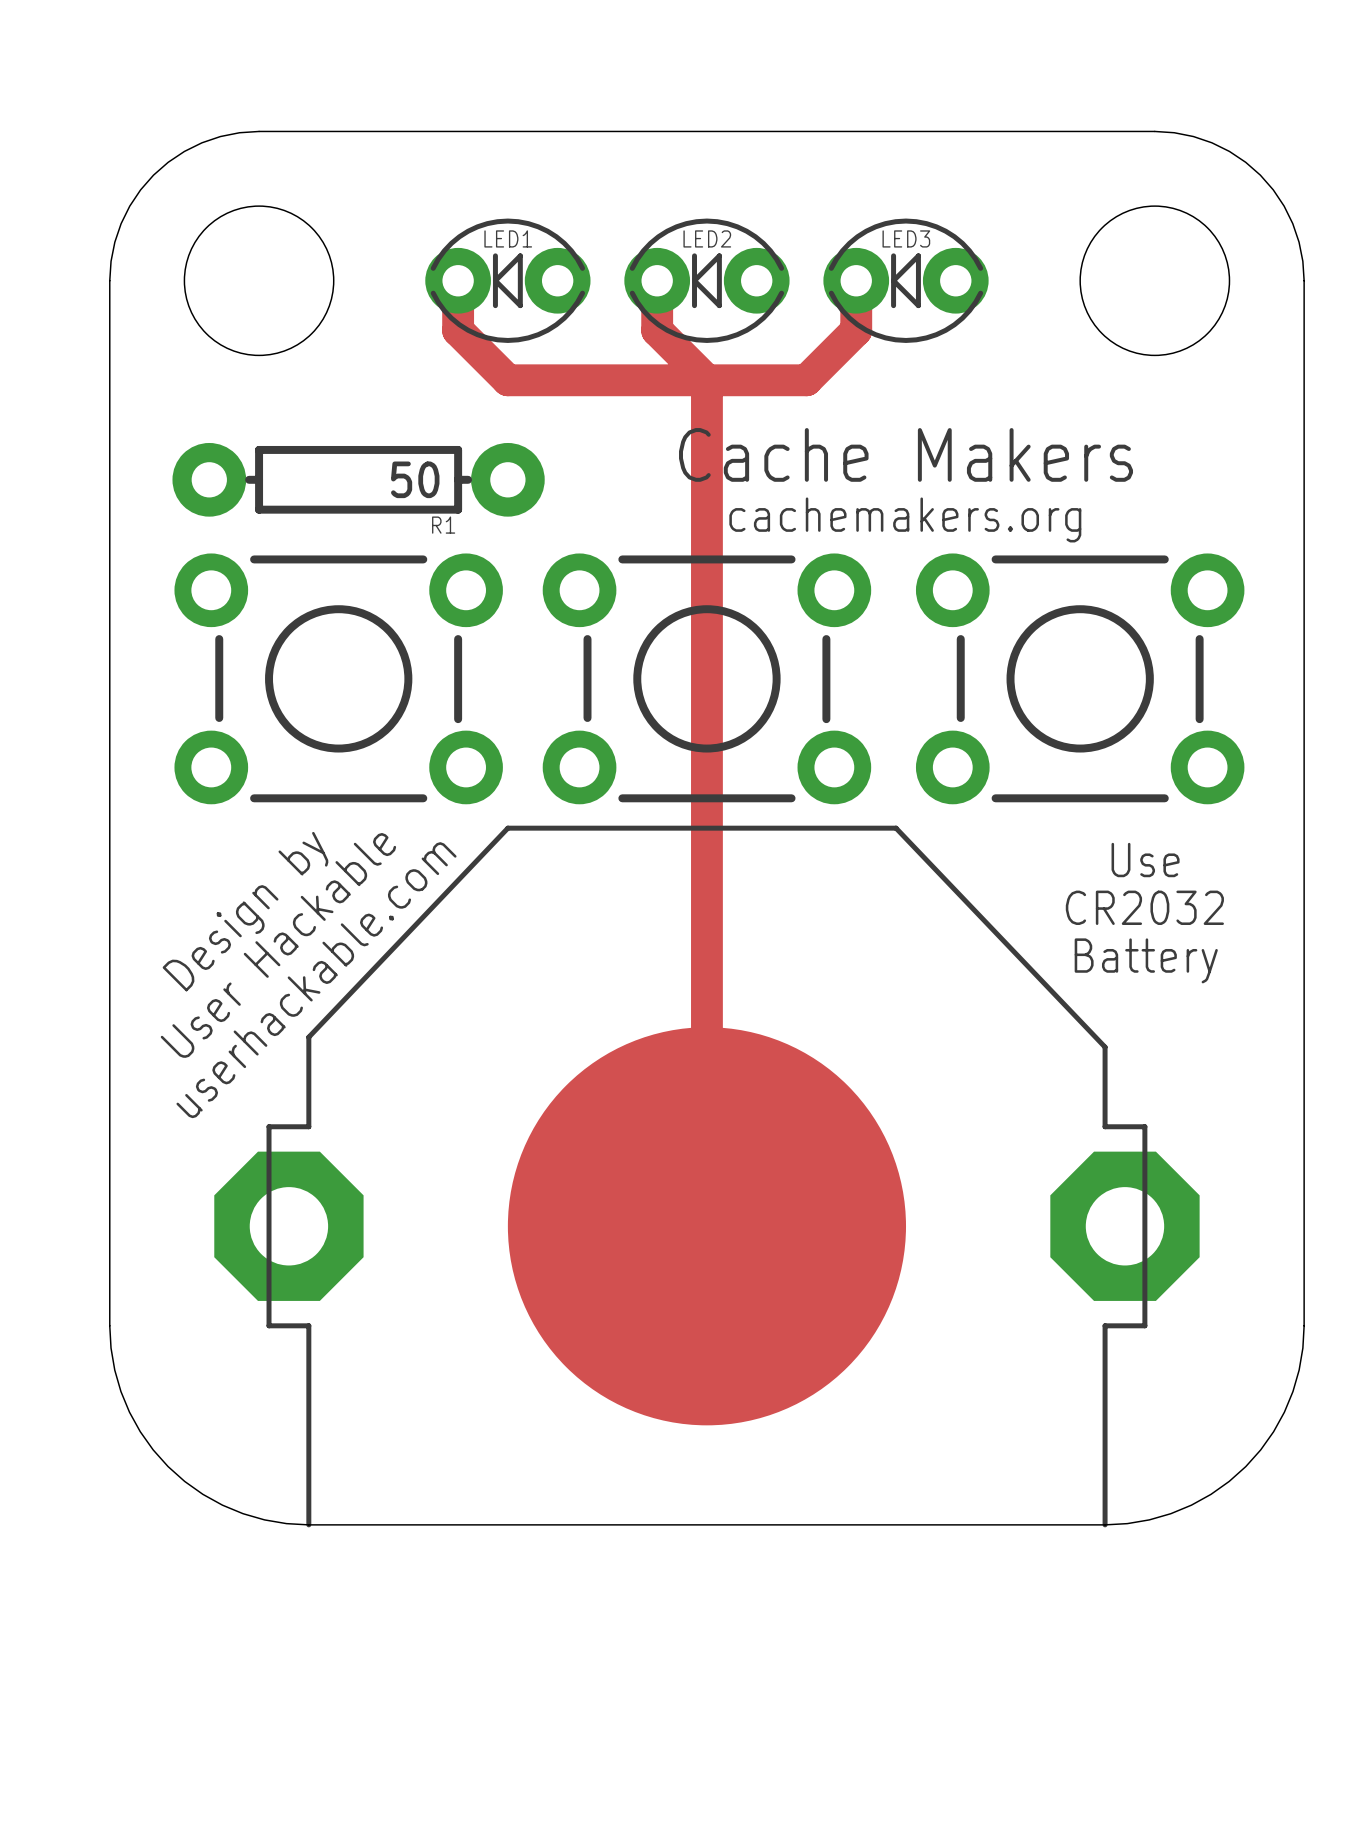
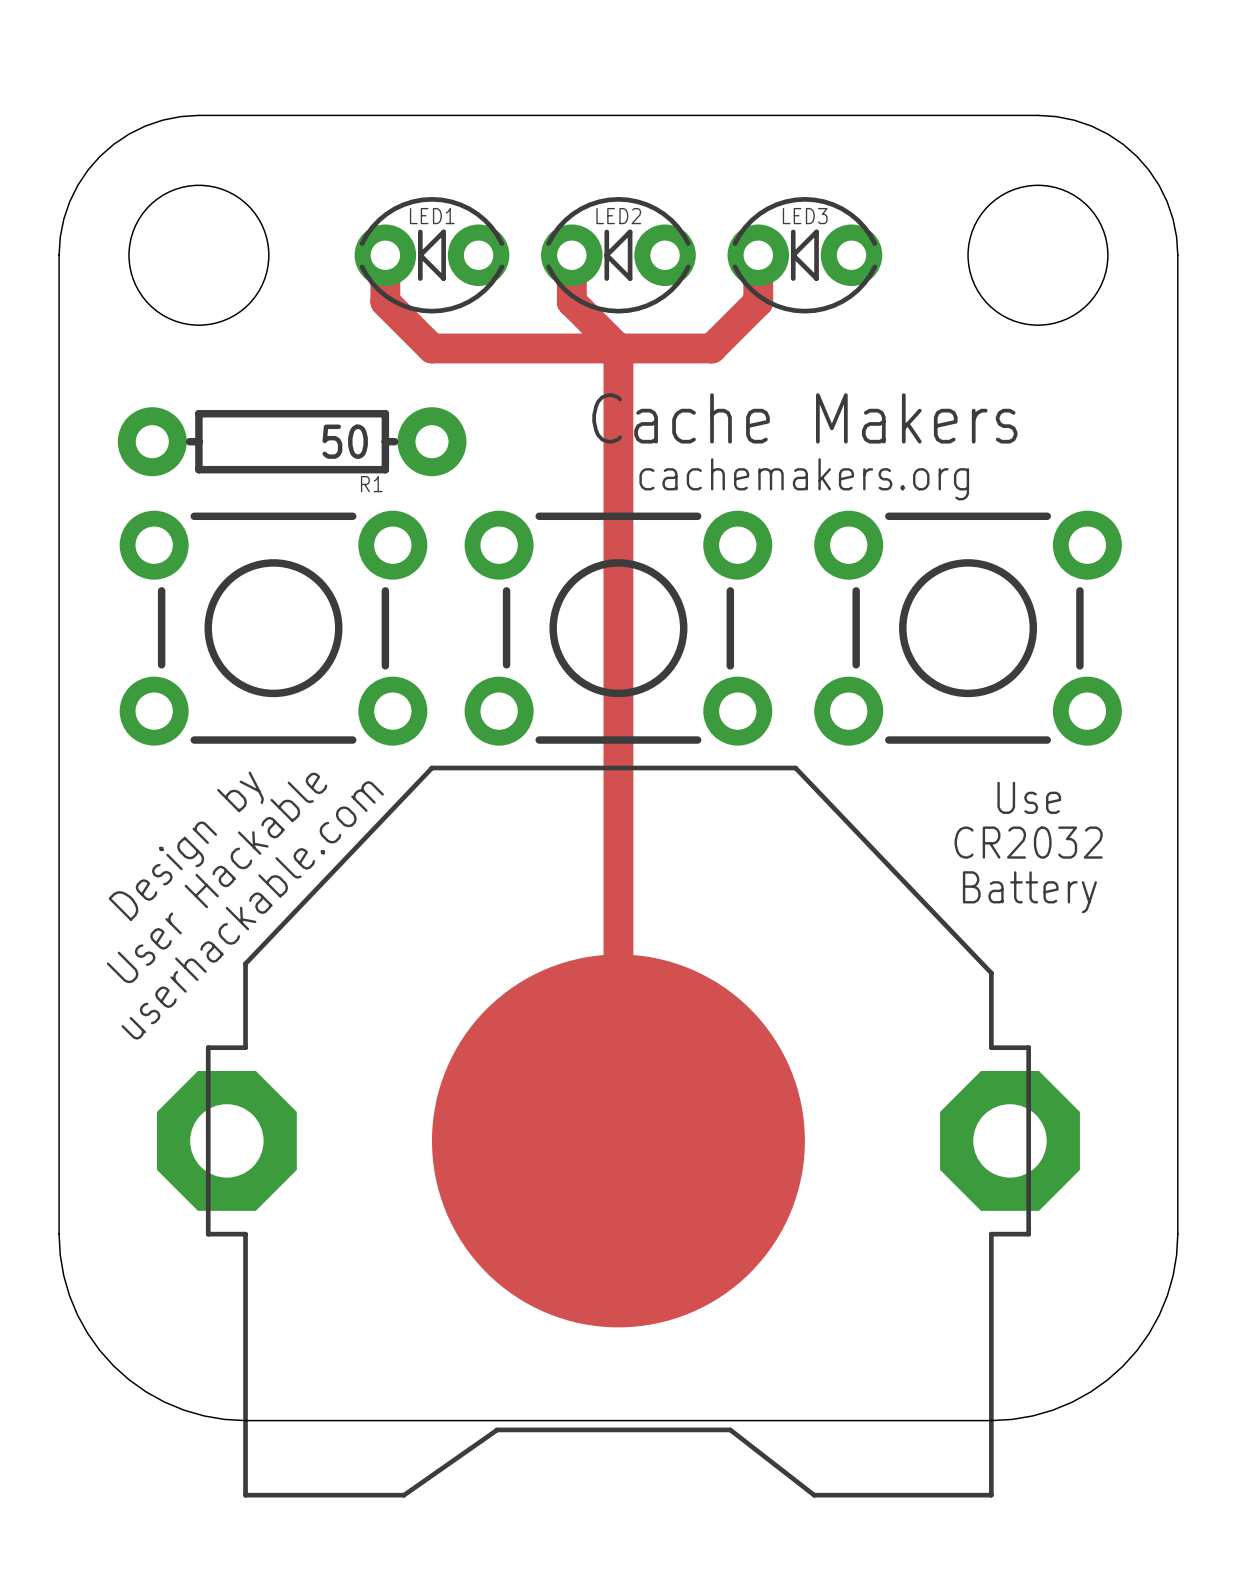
part: (706, 1176) -> none
part: none -> (618, 1131)

